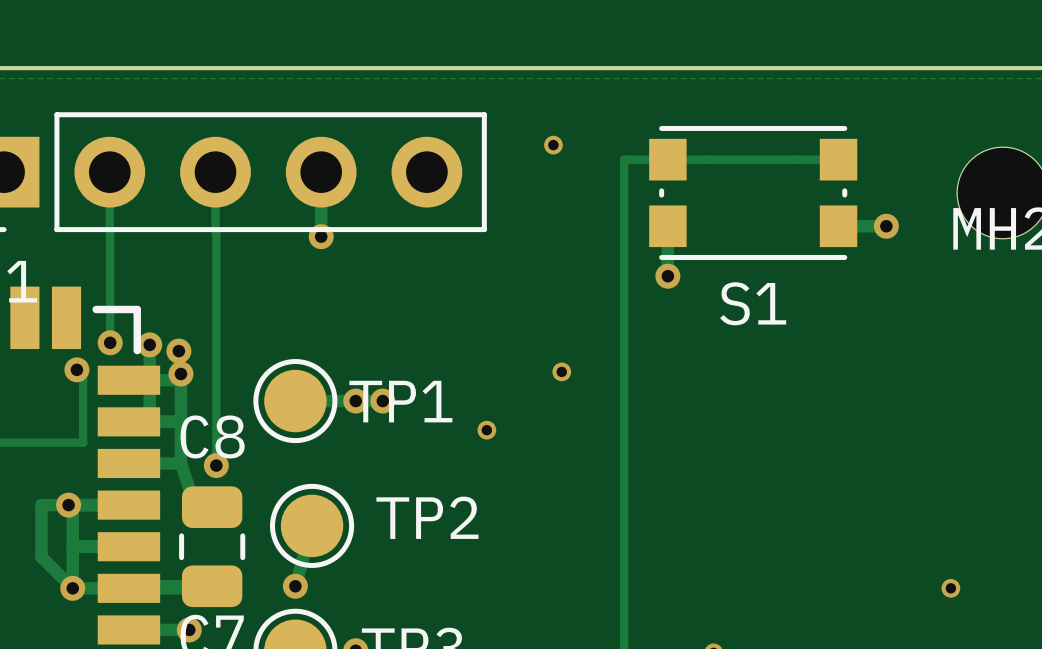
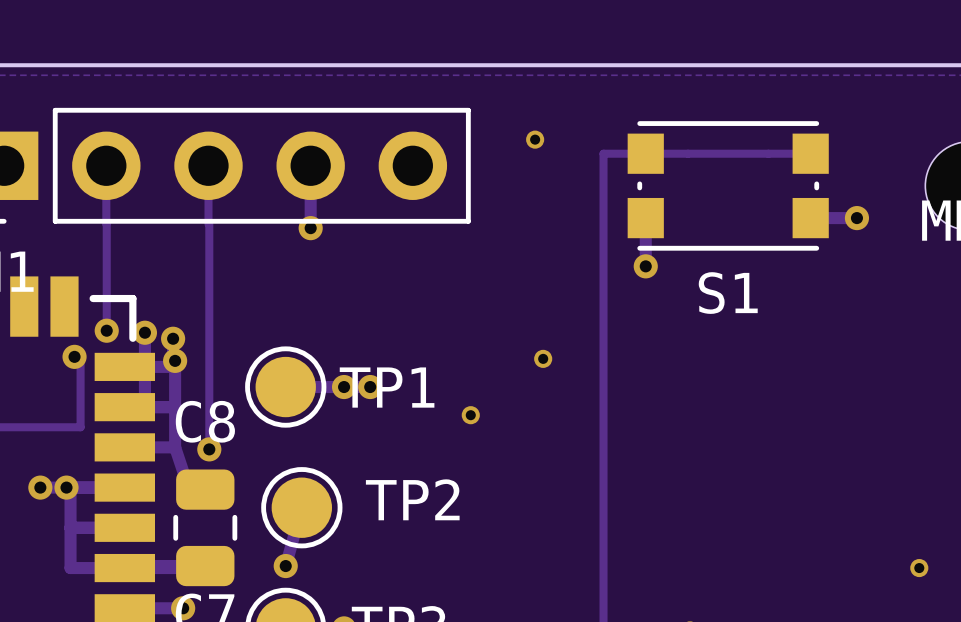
track: (41, 505) (41, 557) (72, 588) -> none
via position: (72, 588) -> (40, 487)

